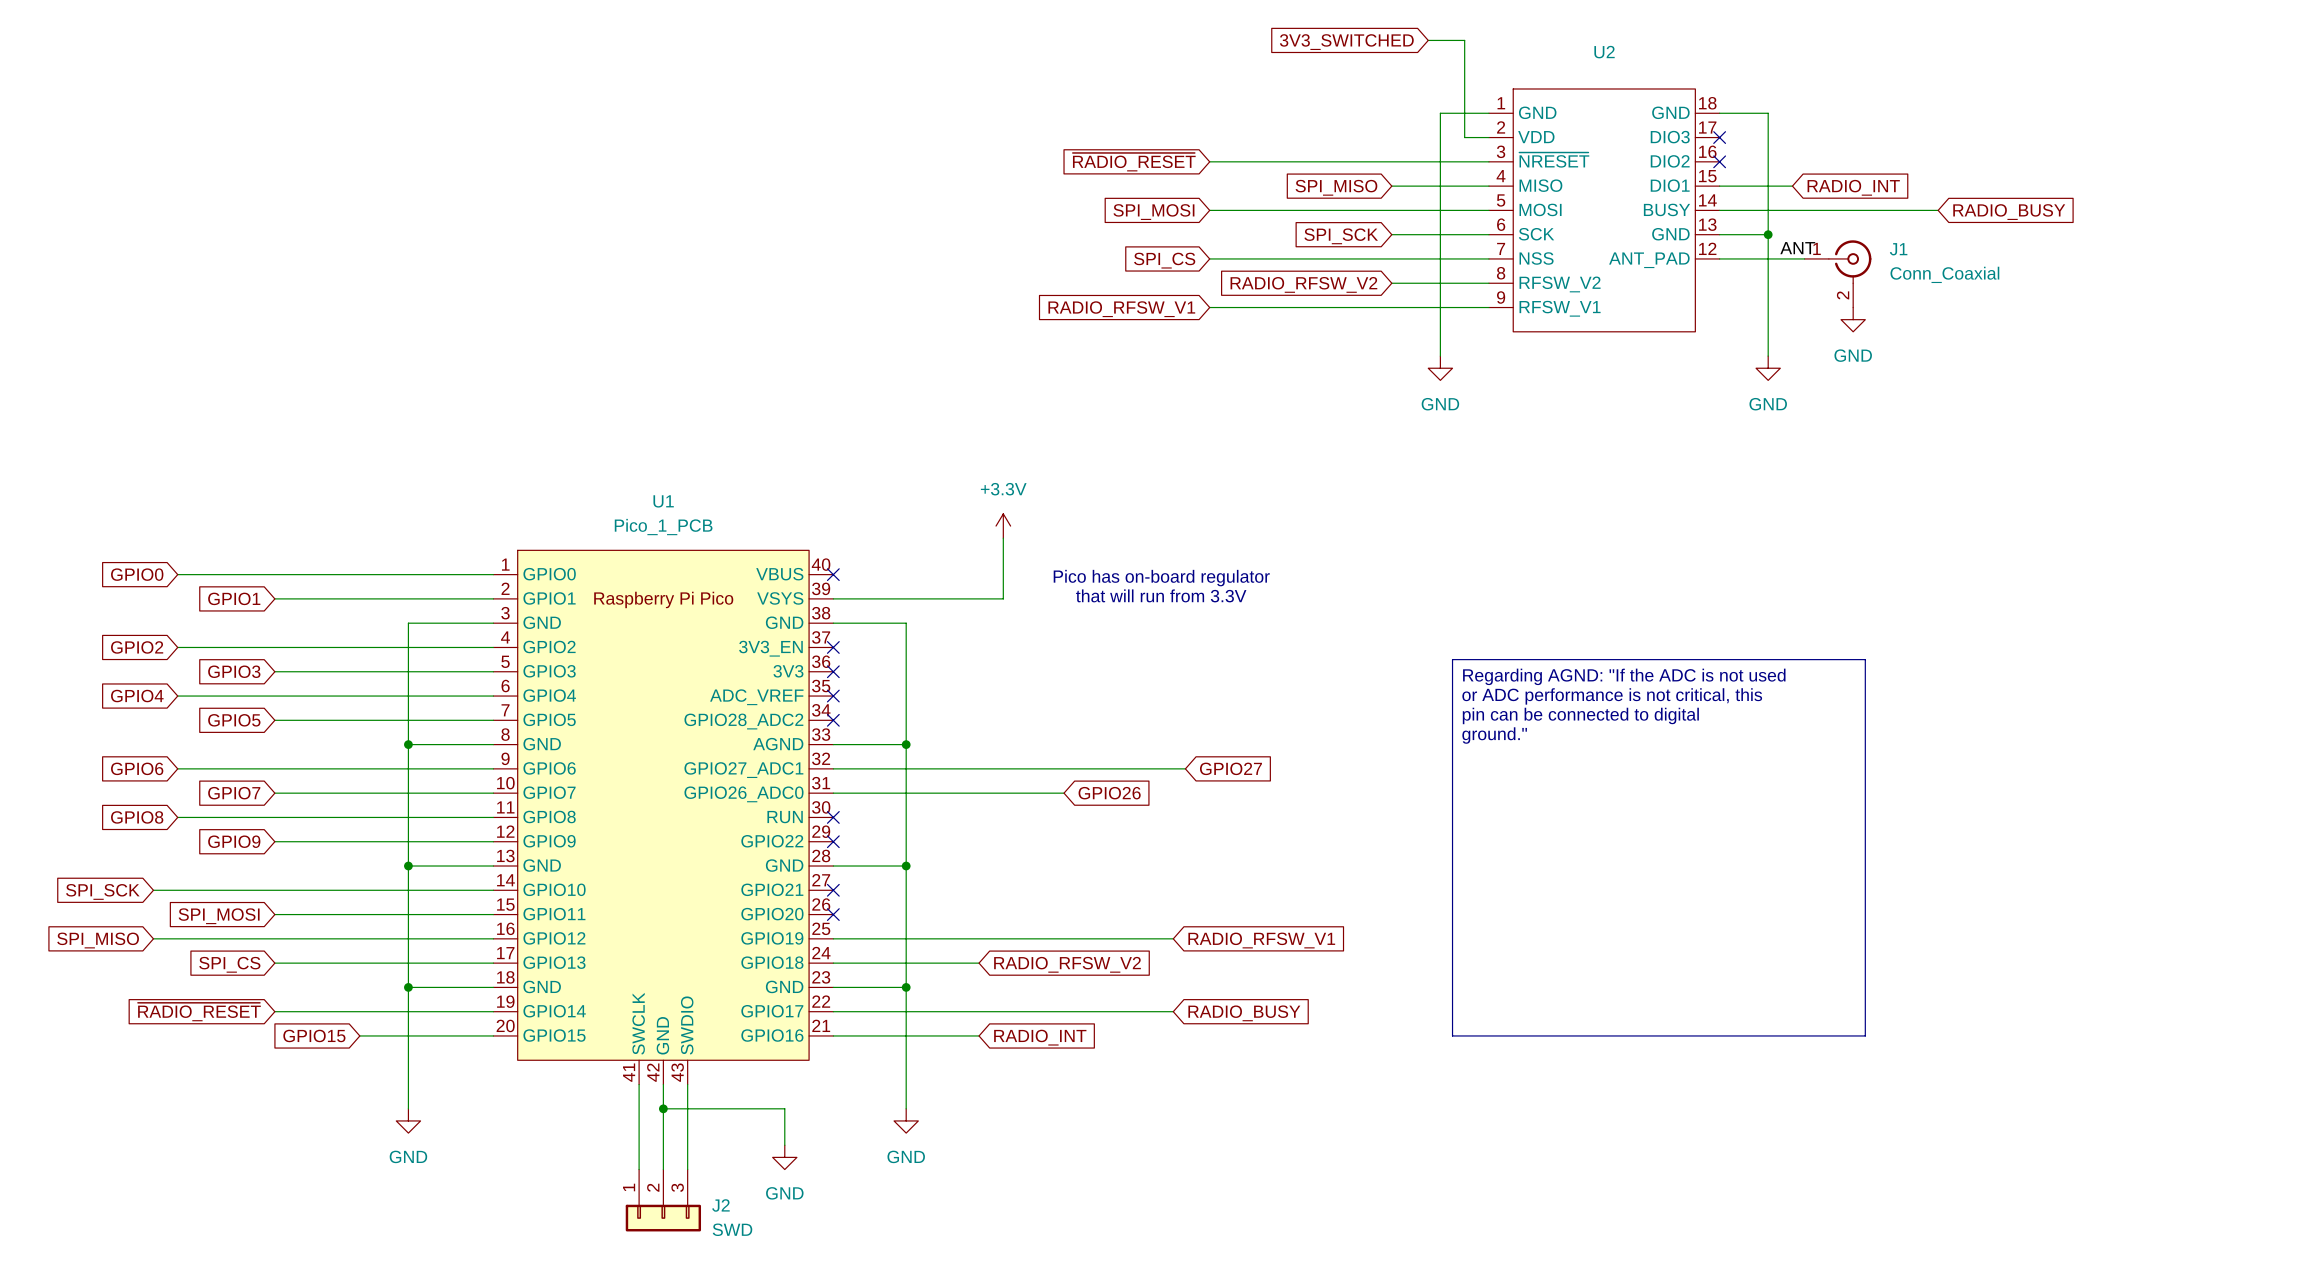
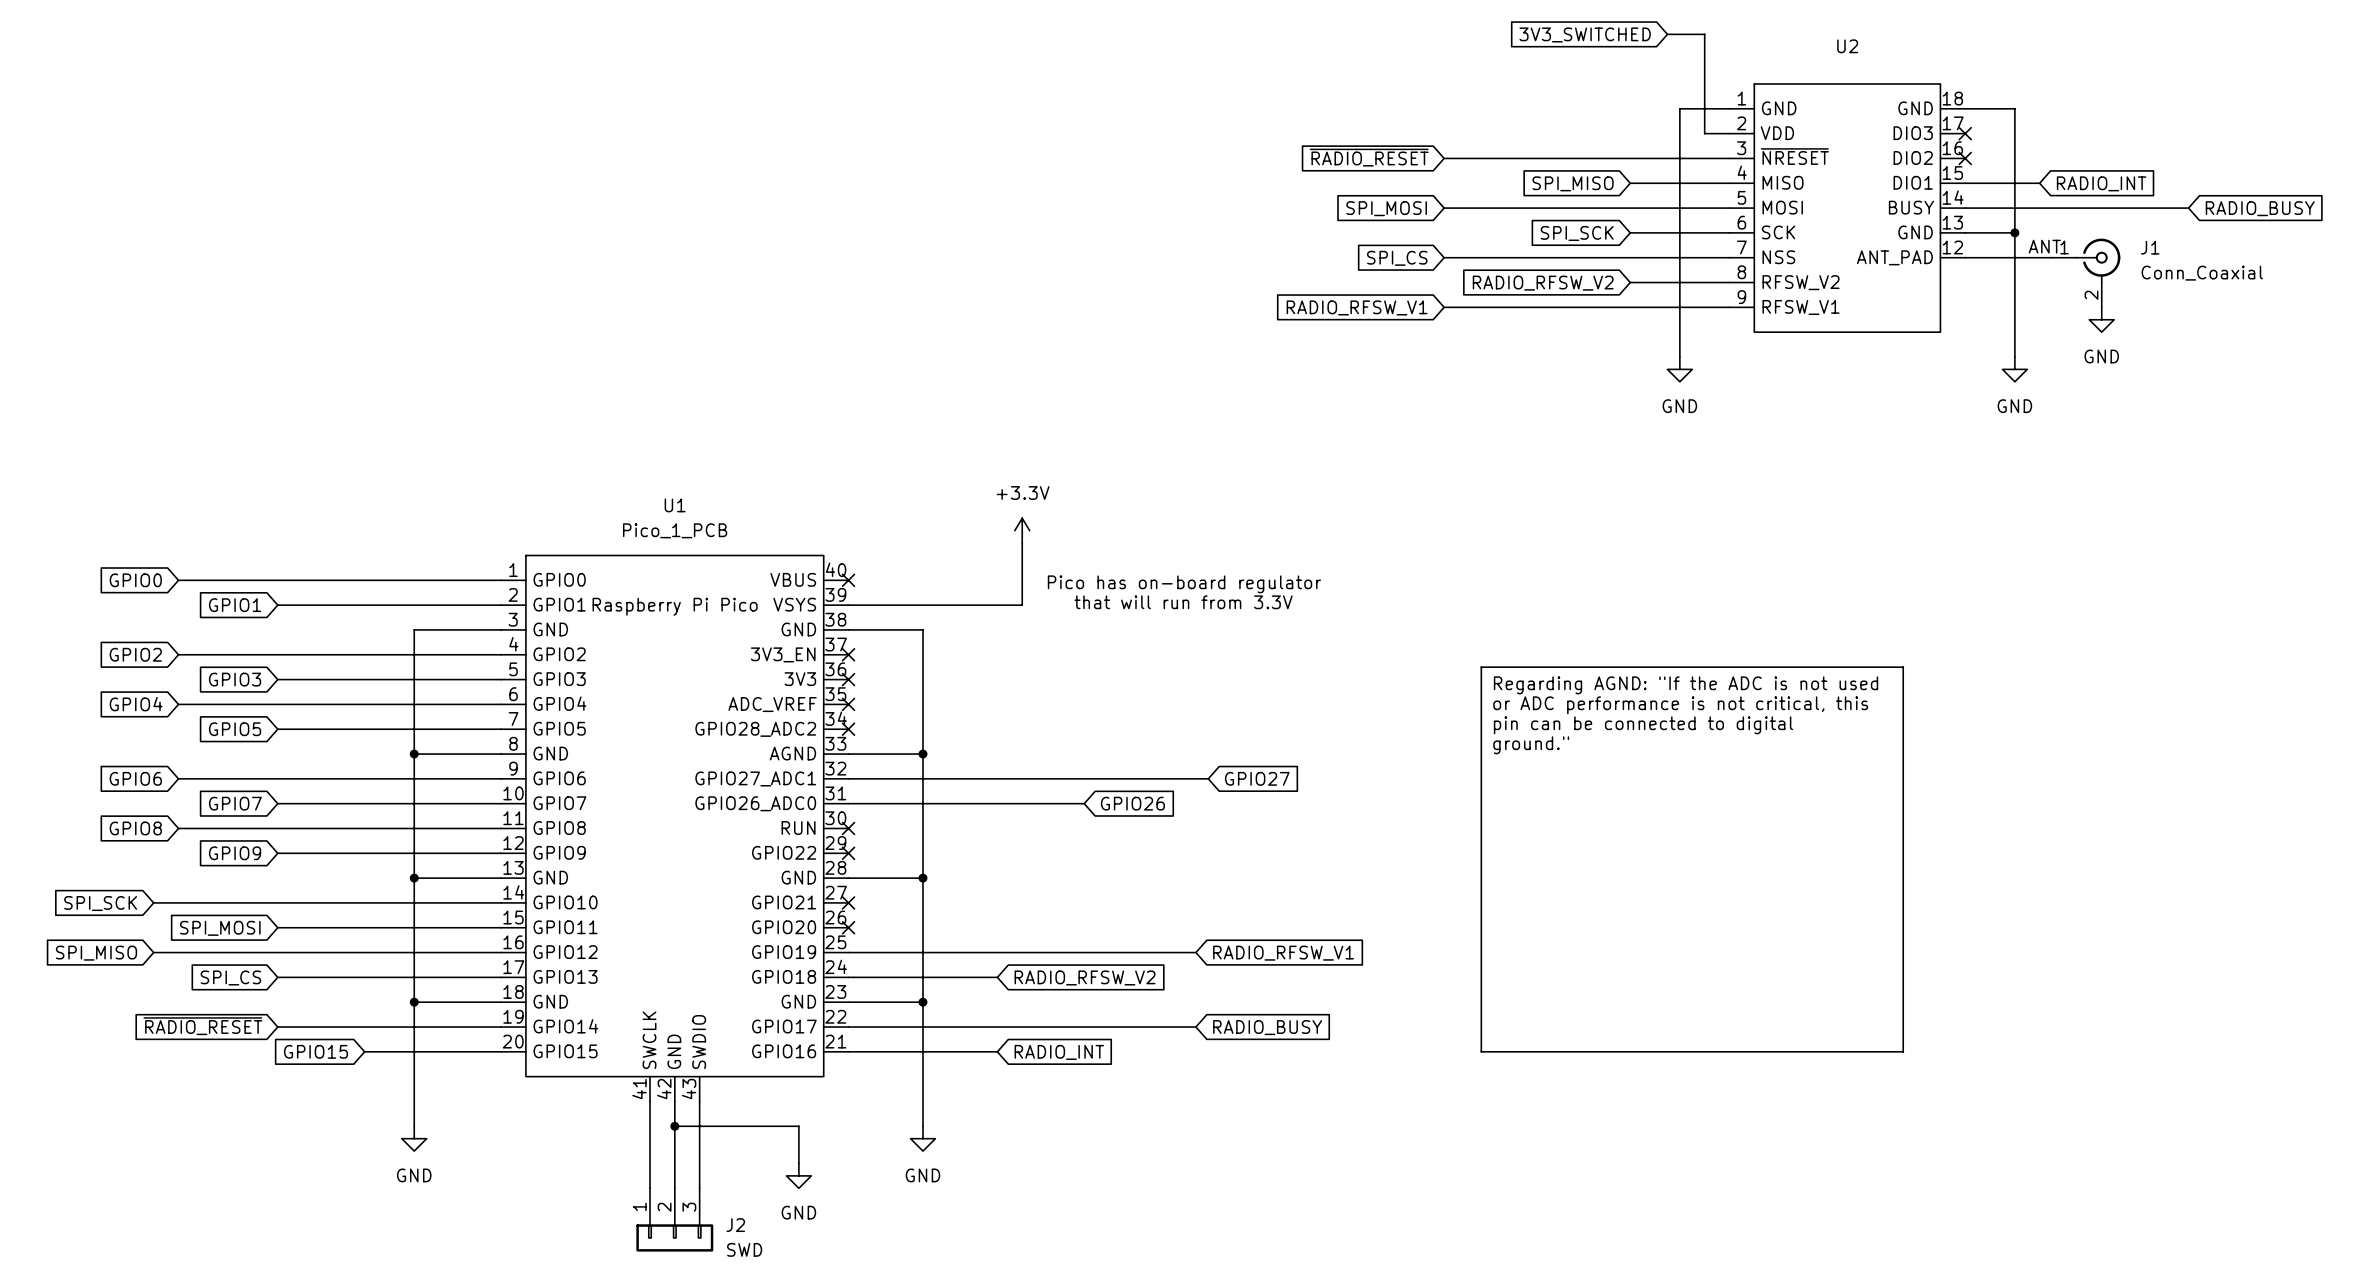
wire: (1428, 40) (1464, 40) (1464, 137) (1488, 137) -> (1667, 34) (1704, 34) (1704, 133) (1729, 133)
global label position: 3V3_SWITCHED (1346, 42) -> 3V3_SWITCHED (1585, 34)
wire: (1488, 113) (1440, 113) (1440, 356) -> (1729, 108) (1679, 108) (1679, 356)
wire: (1719, 113) (1768, 113) (1768, 356) -> (1965, 108) (2014, 108) (2014, 356)
no-connect mark: (1719, 137) -> none
no-connect mark: none -> (1965, 133)
wire: (1209, 161) (1416, 161) -> none
wire: none -> (1518, 158) (1729, 158)
no-connect mark: (1719, 161) -> none
no-connect mark: none -> (1965, 158)
global label position: ~{RADIO_RESET} (1134, 162) -> ~{RADIO_RESET} (1369, 157)
wire: (1391, 186) (1488, 186) -> (1630, 183) (1729, 183)
wire: (1719, 186) (1792, 186) -> (1965, 183) (2039, 183)
global label position: SPI_MISO (1336, 187) -> SPI_MISO (1573, 183)
global label position: RADIO_INT (1853, 187) -> RADIO_INT (2101, 183)
wire: (1209, 210) (1416, 210) -> none
wire: none -> (1518, 208) (1729, 208)
U2 position: (1604, 210) -> (1847, 208)
wire: (1719, 210) (1926, 210) -> (1977, 208) (2188, 208)
global label position: SPI_MOSI (1153, 212) -> SPI_MOSI (1386, 208)
global label position: RADIO_BUSY (2009, 212) -> RADIO_BUSY (2260, 208)
wire: (1391, 234) (1488, 234) -> (1630, 232) (1729, 232)
wire: (1719, 234) (1768, 234) -> (1965, 232) (2014, 232)
junction: (1768, 234) -> none
junction: none -> (2014, 232)
global label position: SPI_SCK (1341, 236) -> SPI_SCK (1577, 233)
label position: ANT (1797, 248) -> ANT (2044, 246)
wire: (1209, 258) (1416, 258) -> none
wire: none -> (1518, 257) (1729, 257)
wire: (1719, 258) (1804, 258) -> (1965, 257) (2052, 257)
global label position: SPI_CS (1164, 260) -> SPI_CS (1397, 258)
J1 position: (1838, 273) -> (2086, 272)
wire: (1391, 283) (1488, 283) -> (1630, 282) (1729, 282)
global label position: RADIO_RFSW_V2 (1303, 284) -> RADIO_RFSW_V2 (1543, 283)
wire: (1209, 307) (1416, 307) -> none
wire: none -> (1518, 307) (1729, 307)
global label position: RADIO_RFSW_V1 (1121, 309) -> RADIO_RFSW_V1 (1357, 307)
power symbol: GND (1853, 319) -> none
power symbol: none -> GND (2101, 319)
power symbol: GND (1440, 368) -> none
power symbol: none -> GND (1679, 369)
power symbol: GND (1768, 368) -> none
power symbol: none -> GND (2014, 369)

